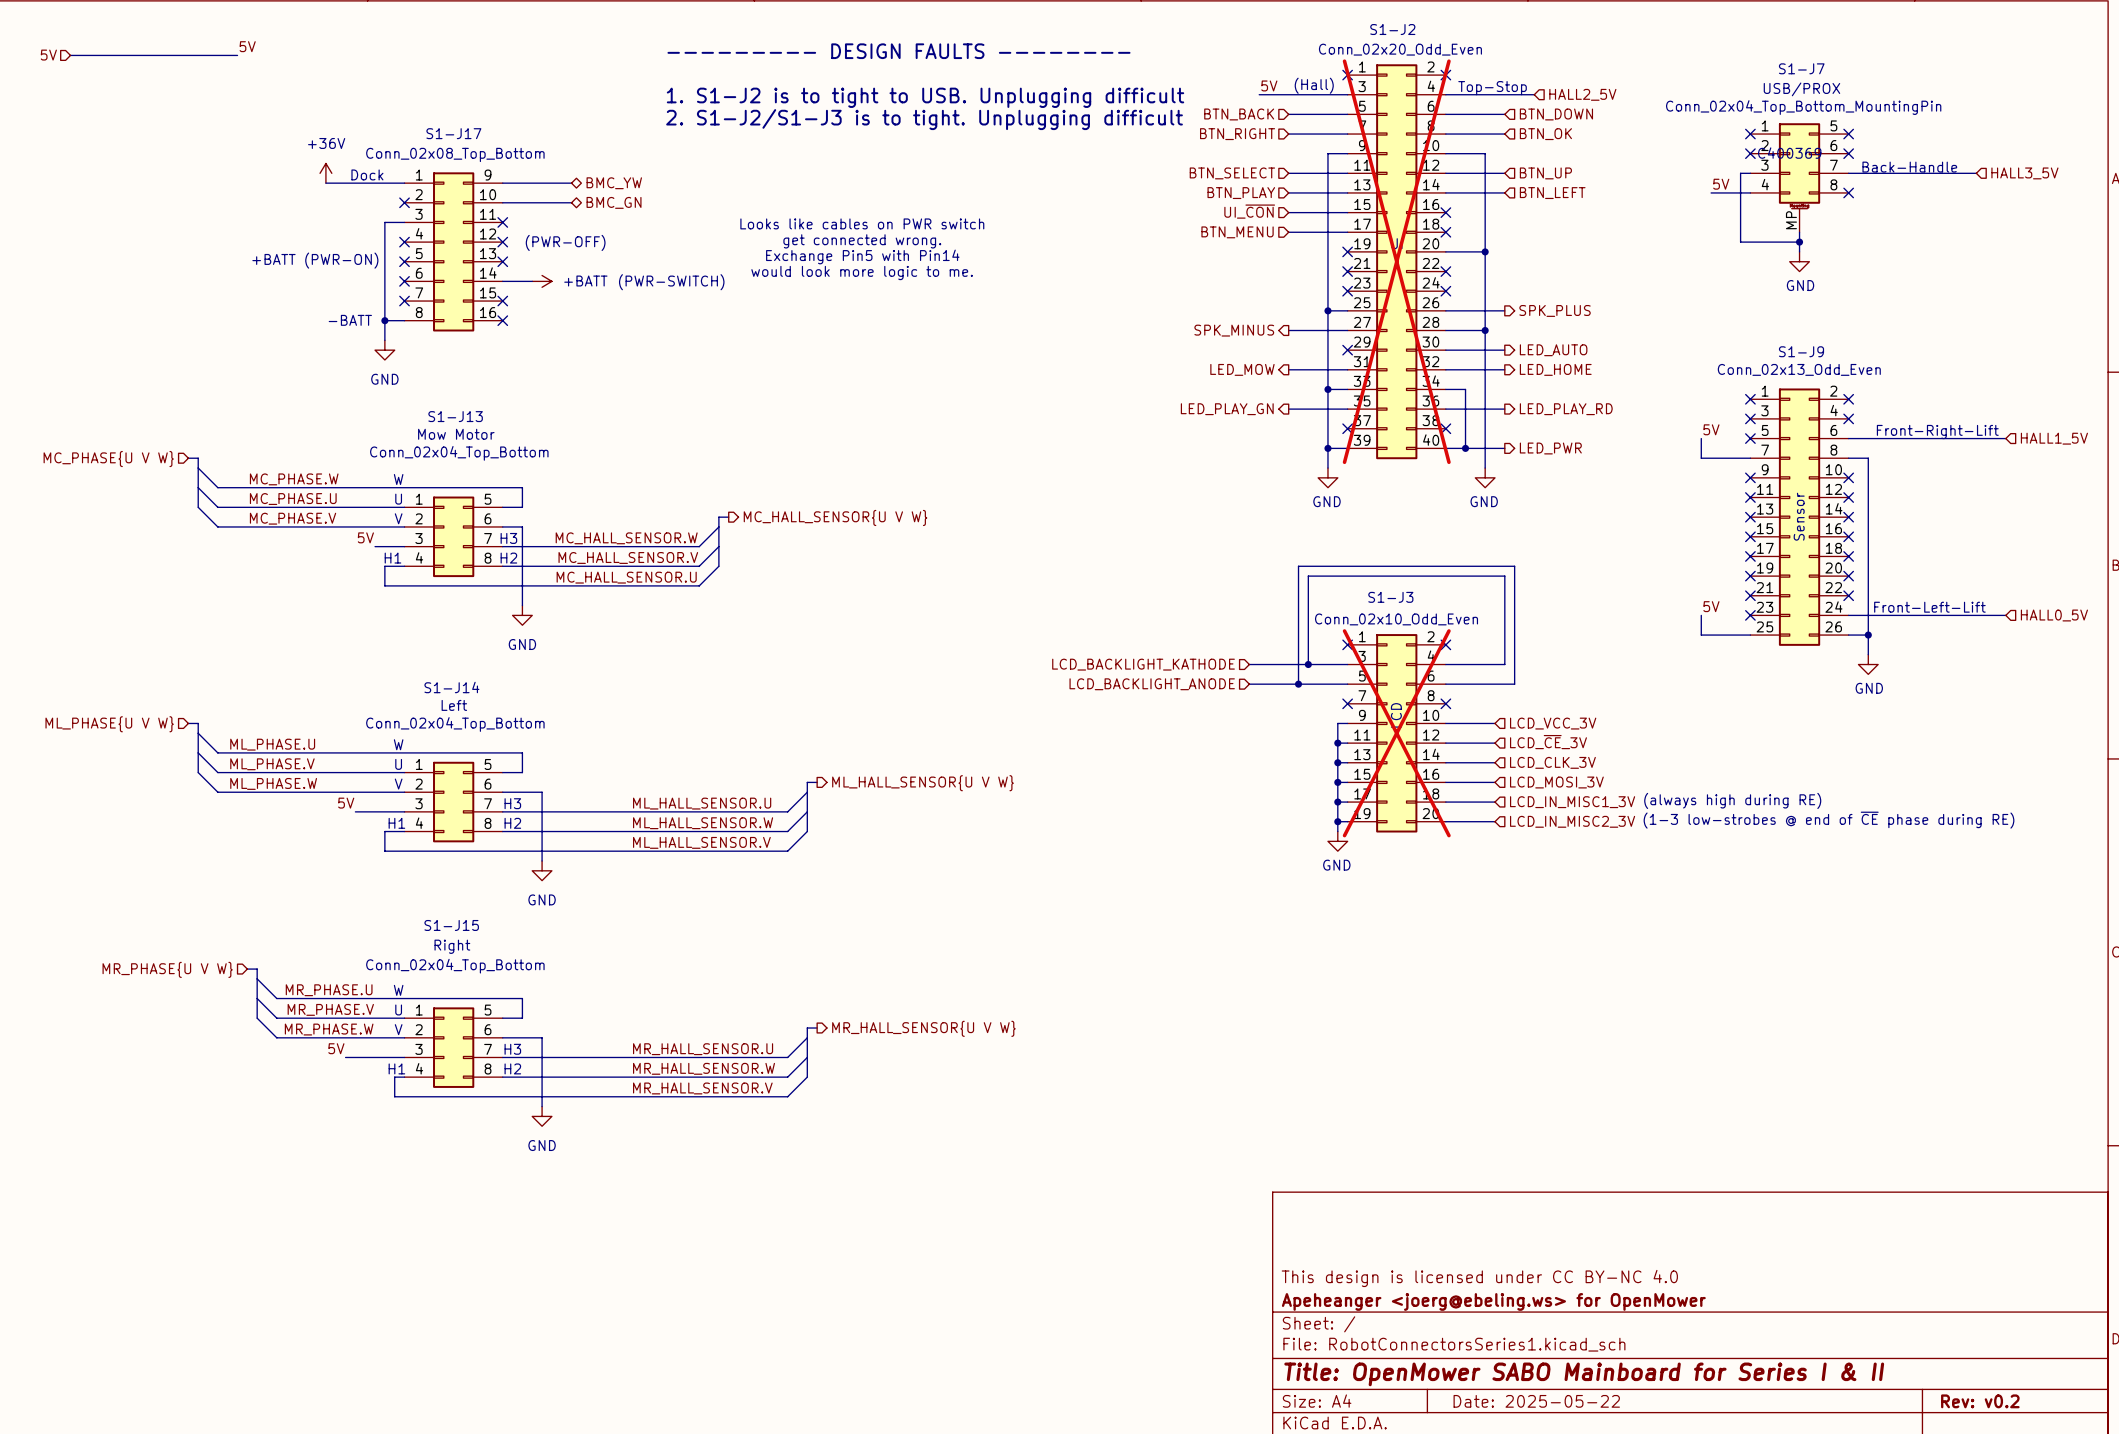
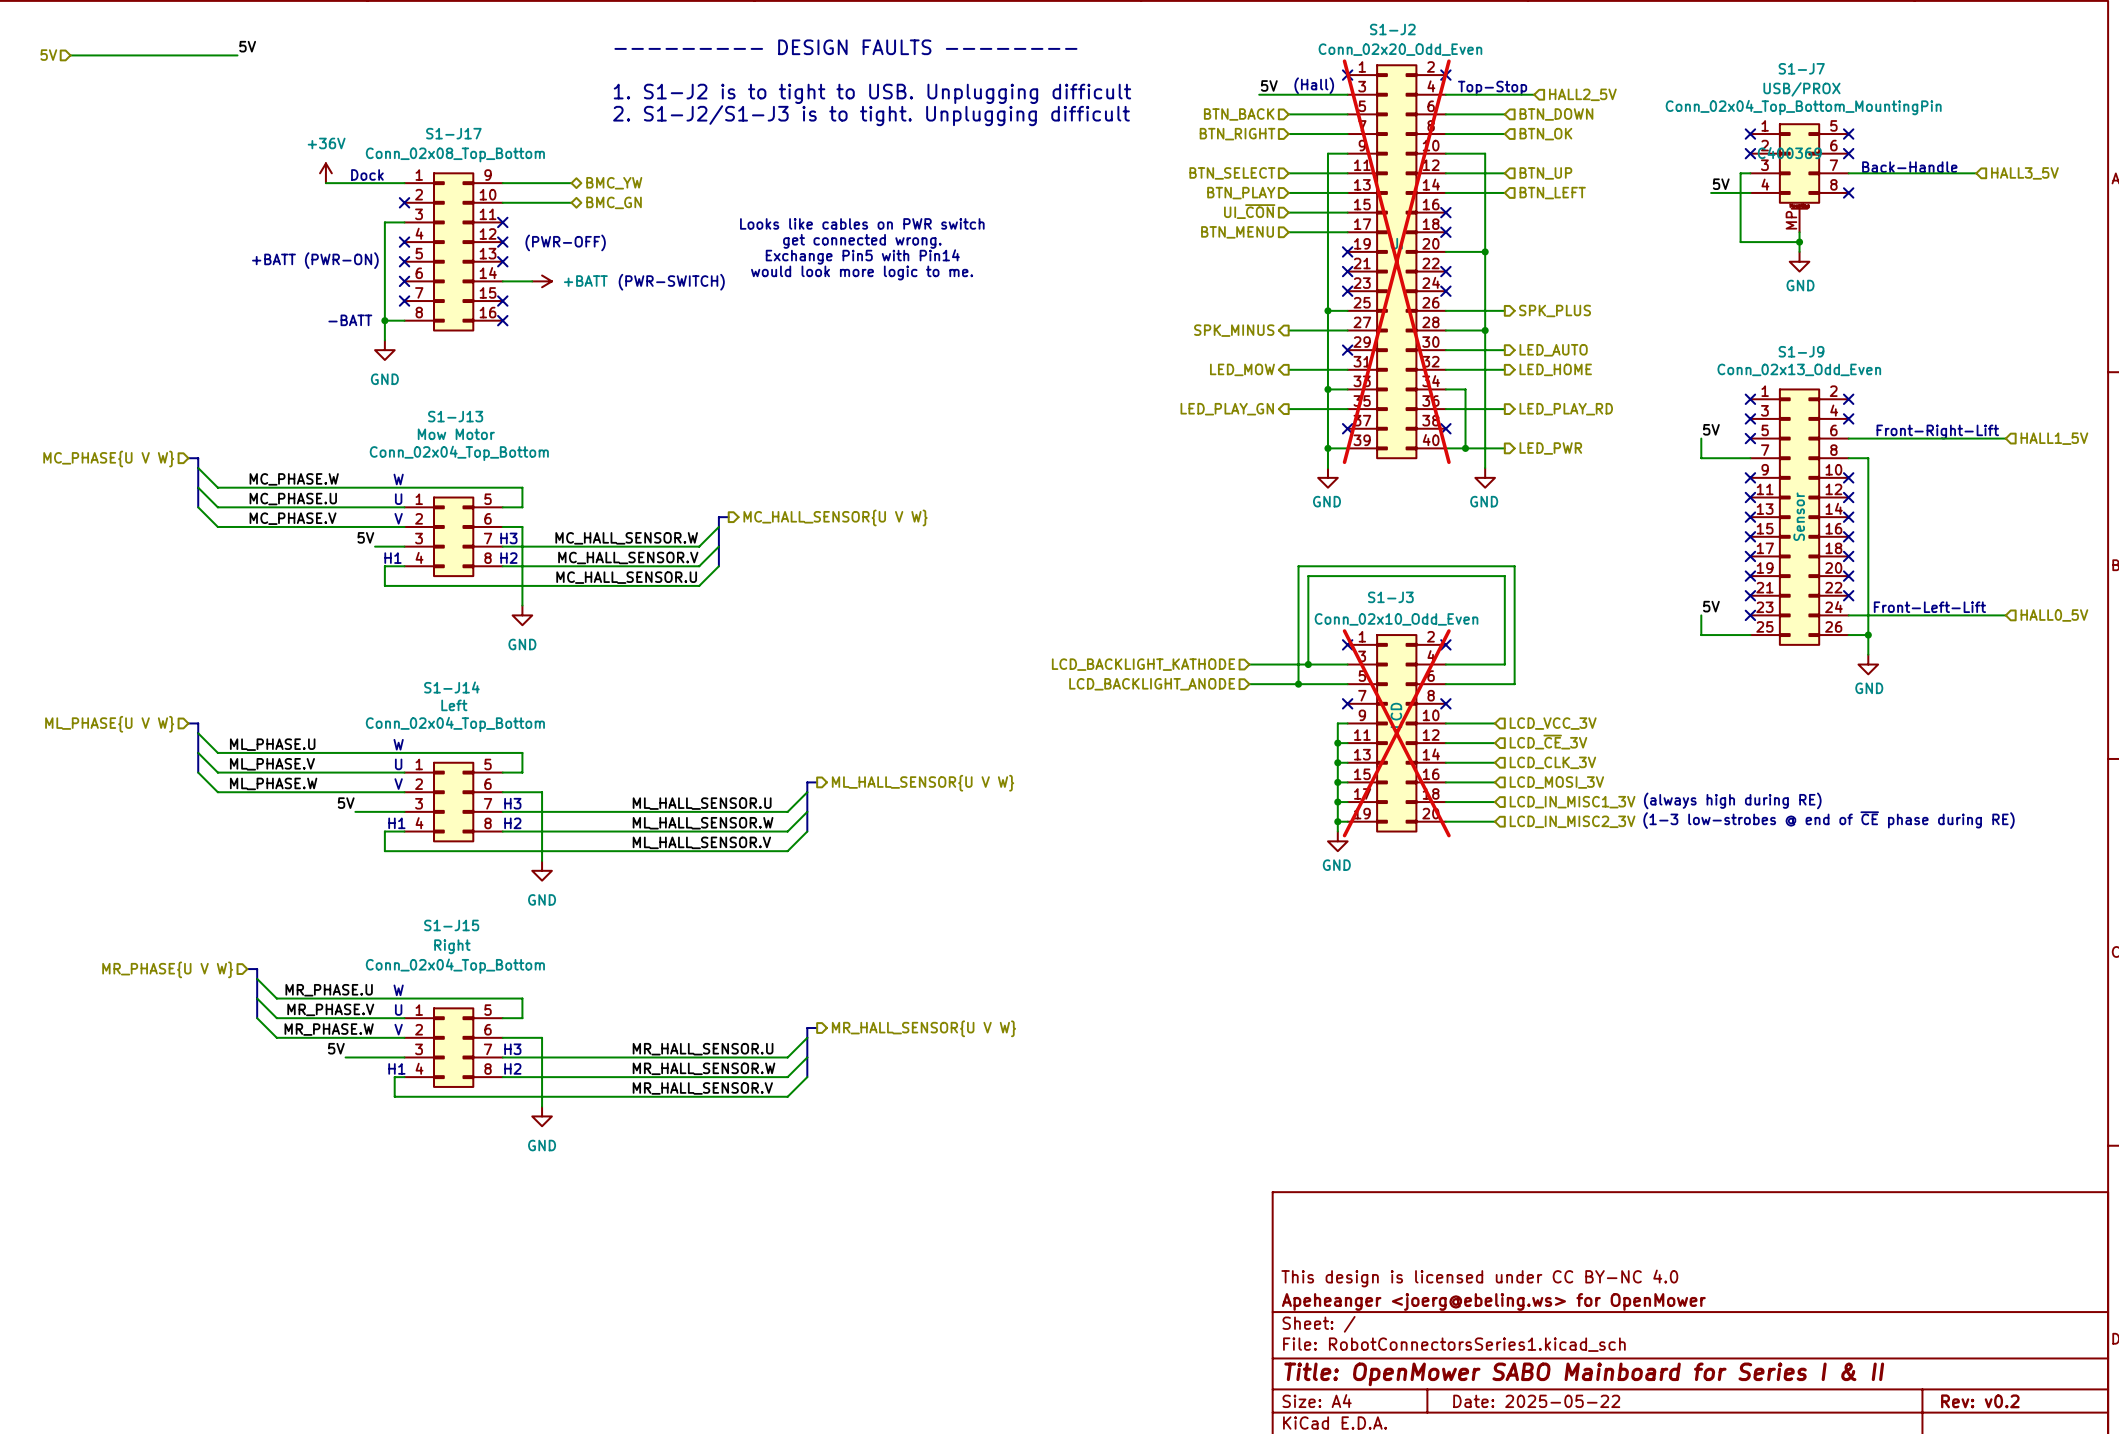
text position: --------- DESIGN FAULTS -------- (898, 51) -> --------- DESIGN FAULTS -------- (845, 47)
text position: 1. S1-J2 is to tight to USB. Unplugging difficult (925, 97) -> 1. S1-J2 is to tight to USB. Unplugging difficult (872, 93)
text position: 2. S1-J2/S1-J3 is to tight. Unplugging difficult (924, 119) -> 2. S1-J2/S1-J3 is to tight. Unplugging difficult (871, 115)

